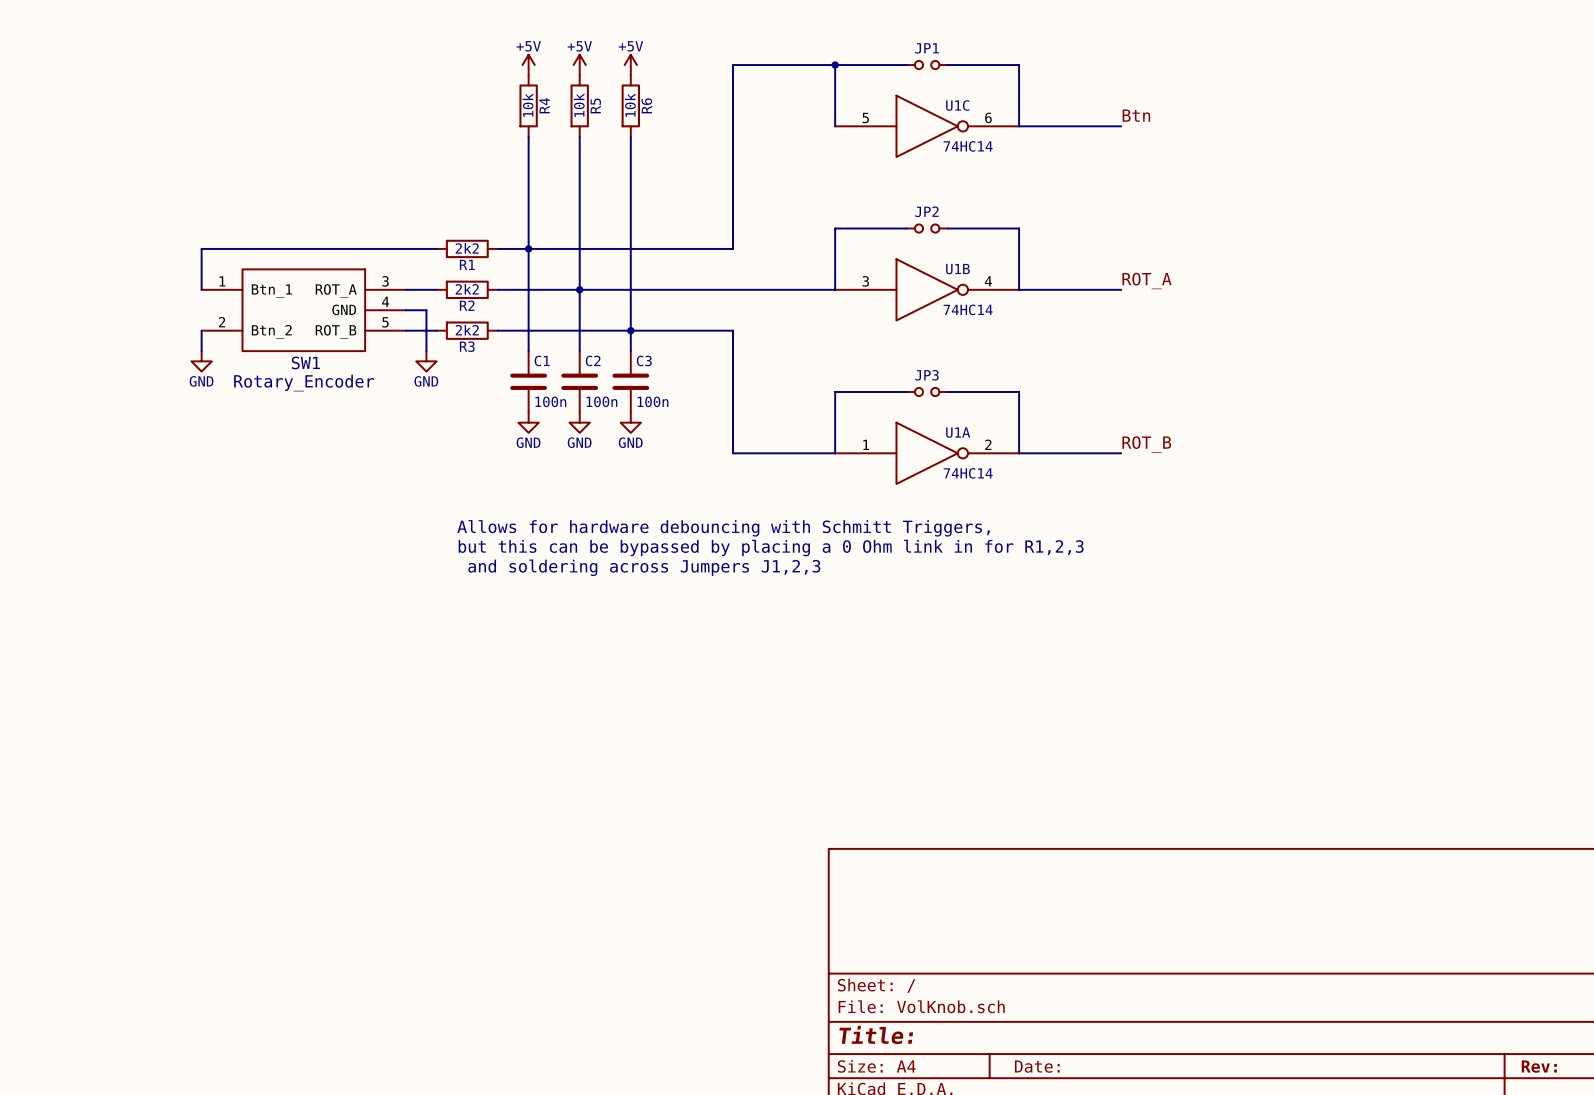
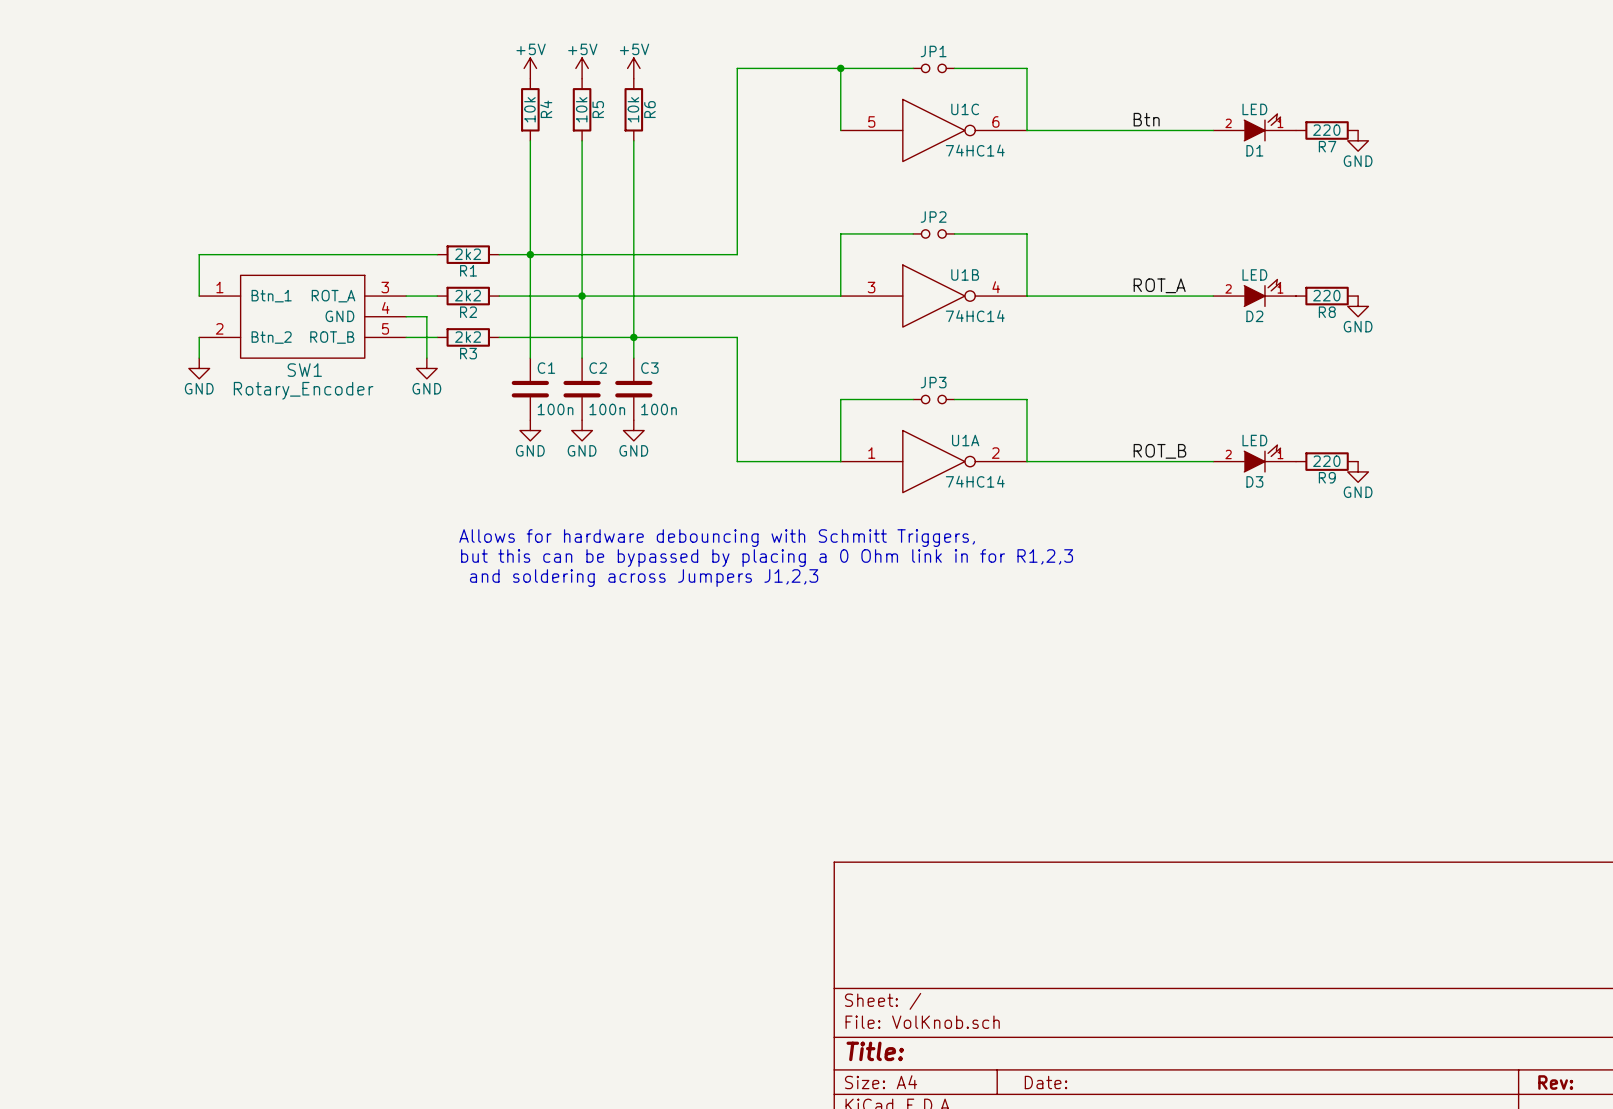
D1: none -> LED (1254, 127)
wire: none -> (1130, 130) (1213, 130)
R7: none -> 220 (1327, 130)
power symbol: none -> GND (1358, 140)
D2: none -> LED (1254, 292)
wire: none -> (1130, 296) (1213, 296)
R8: none -> 220 (1327, 296)
power symbol: none -> GND (1358, 306)
D3: none -> LED (1254, 458)
wire: none -> (1130, 461) (1213, 461)
R9: none -> 220 (1327, 461)
power symbol: none -> GND (1358, 471)

